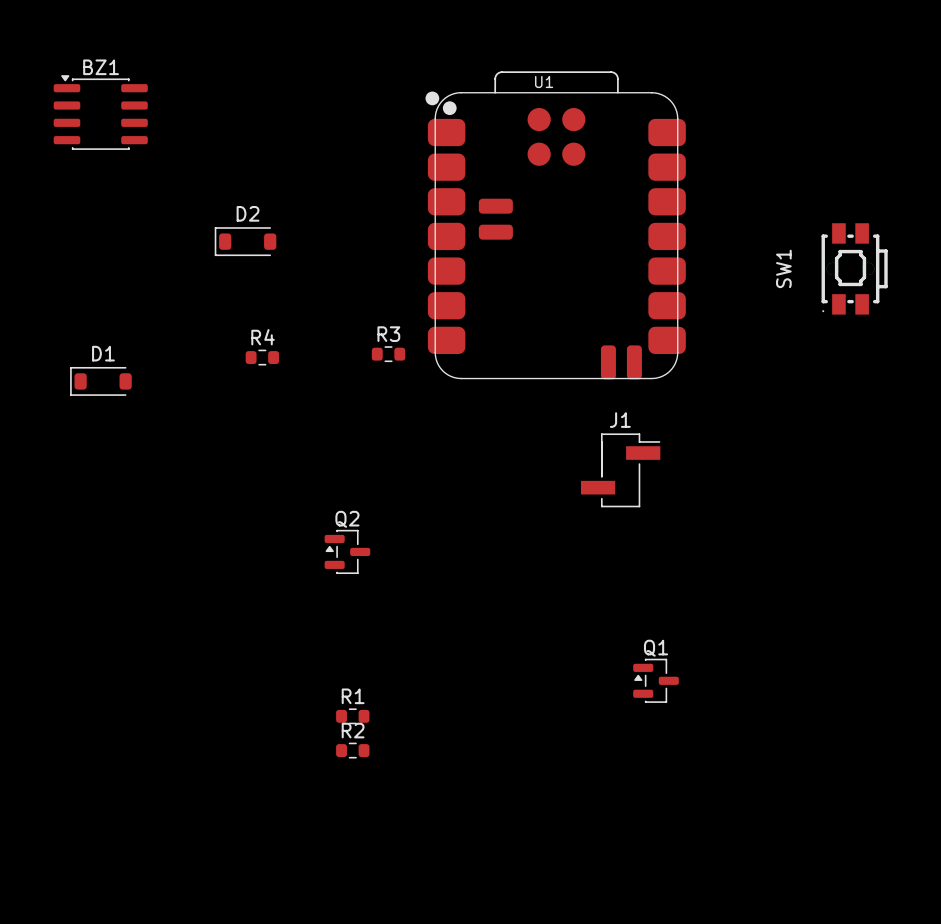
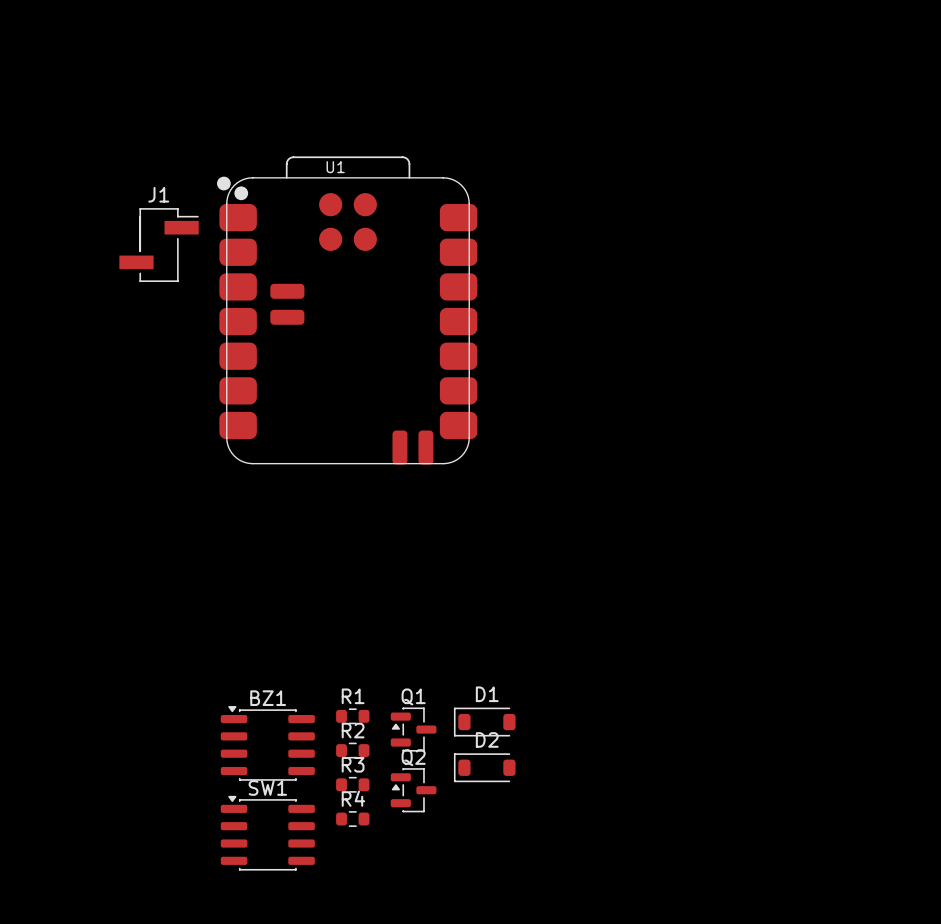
BZ1 position: (100, 112) -> (267, 743)
SW1 footprint: [821, 223, 888, 315] -> [220, 795, 315, 871]
U1 position: (555, 225) -> (347, 310)
D2 position: (245, 241) -> (484, 767)
SW1 name position: SW1 (783, 268) -> SW1 (267, 787)
R3 position: (388, 354) -> (352, 784)
R4 position: (262, 357) -> (352, 819)
D1 position: (100, 381) -> (484, 722)
J1 position: (620, 470) -> (159, 245)
Q2 position: (347, 551) -> (413, 790)
Q1 position: (656, 680) -> (413, 729)

